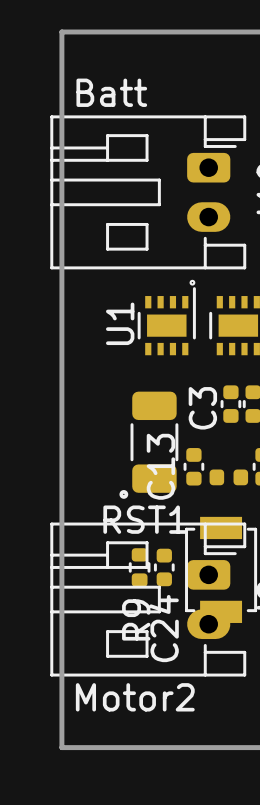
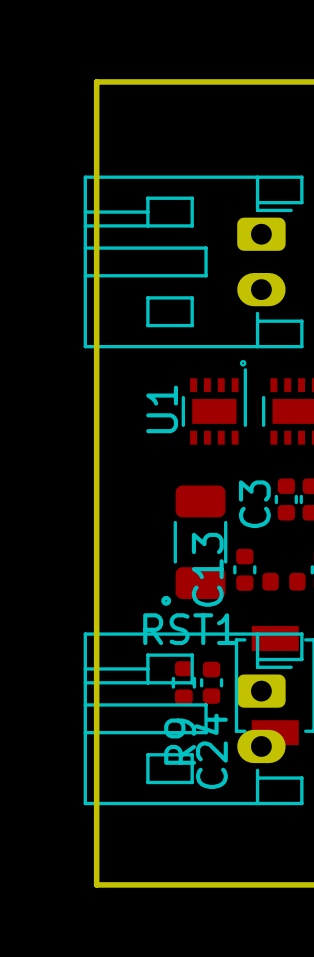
text: Batt (111, 92) -> none
text: Motor2 (135, 697) -> none

